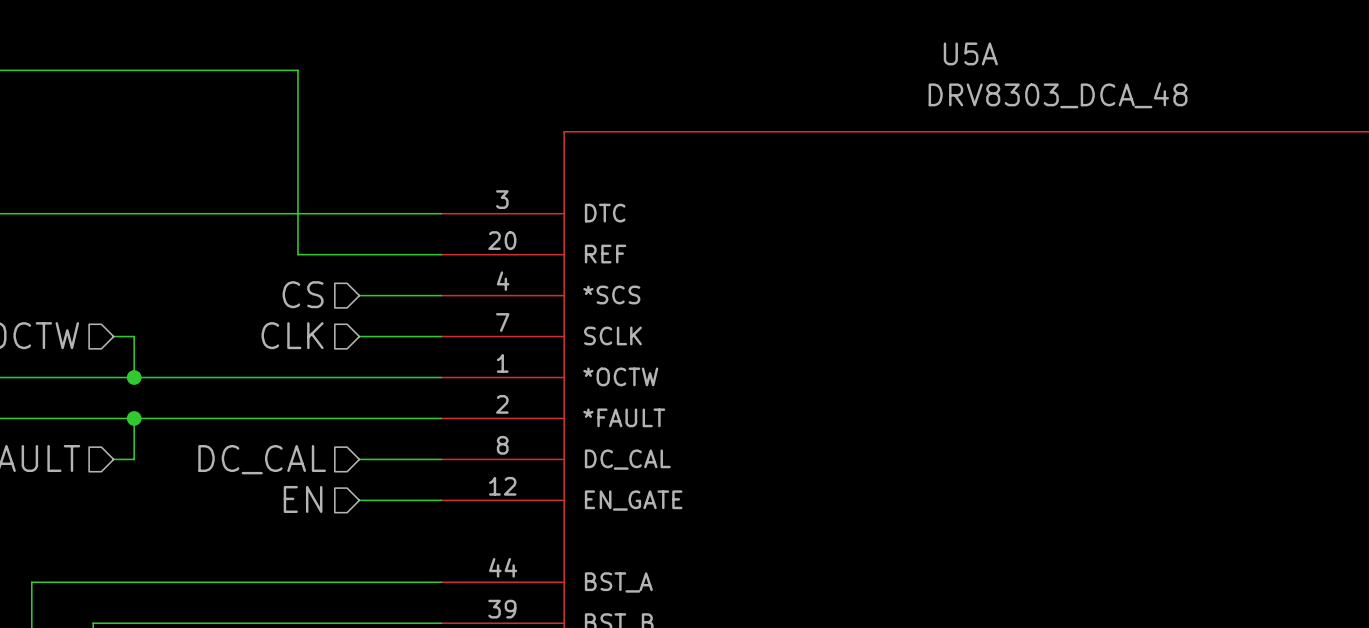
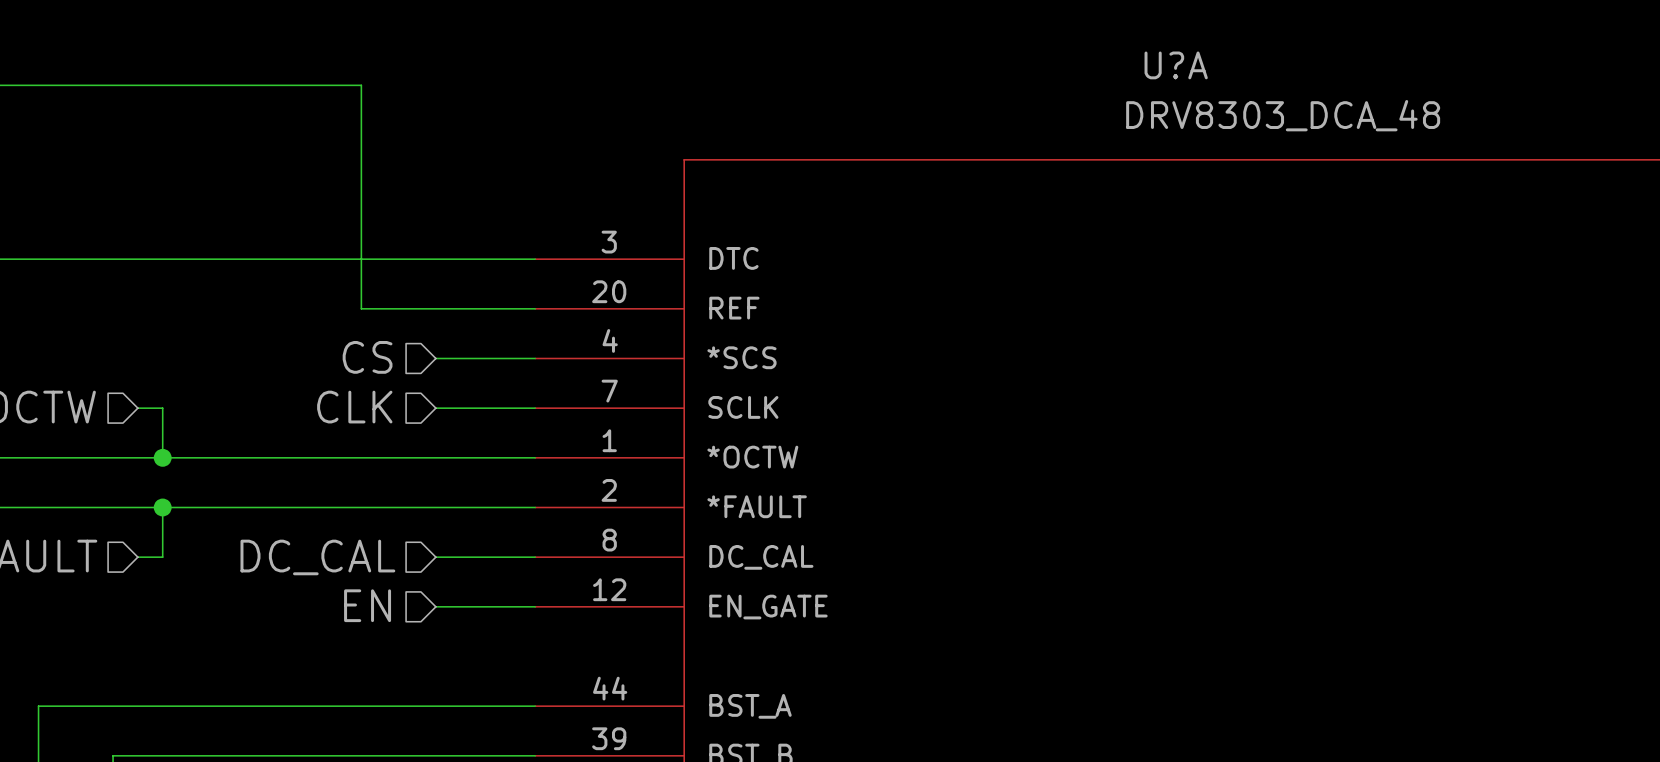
U5A name: U5A (970, 53) -> U?A (1176, 65)

